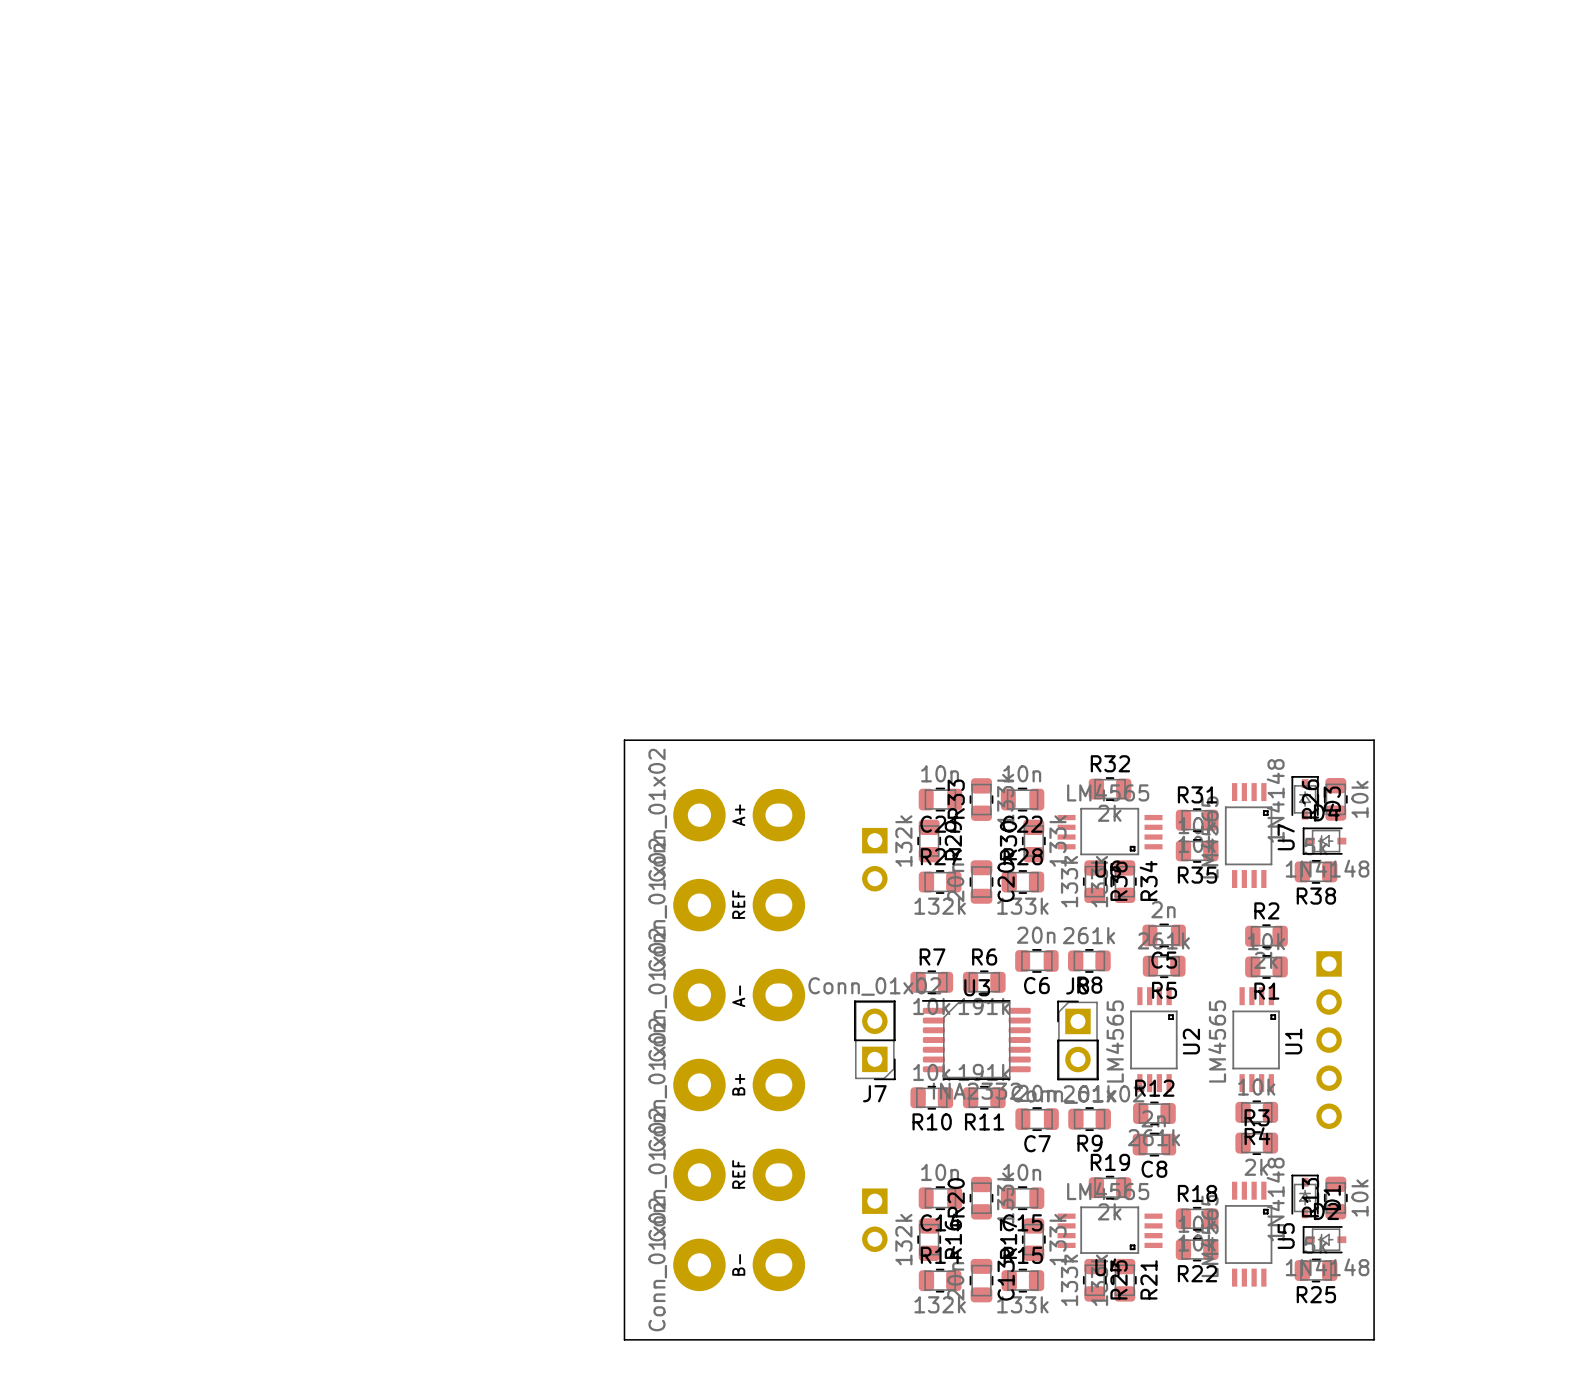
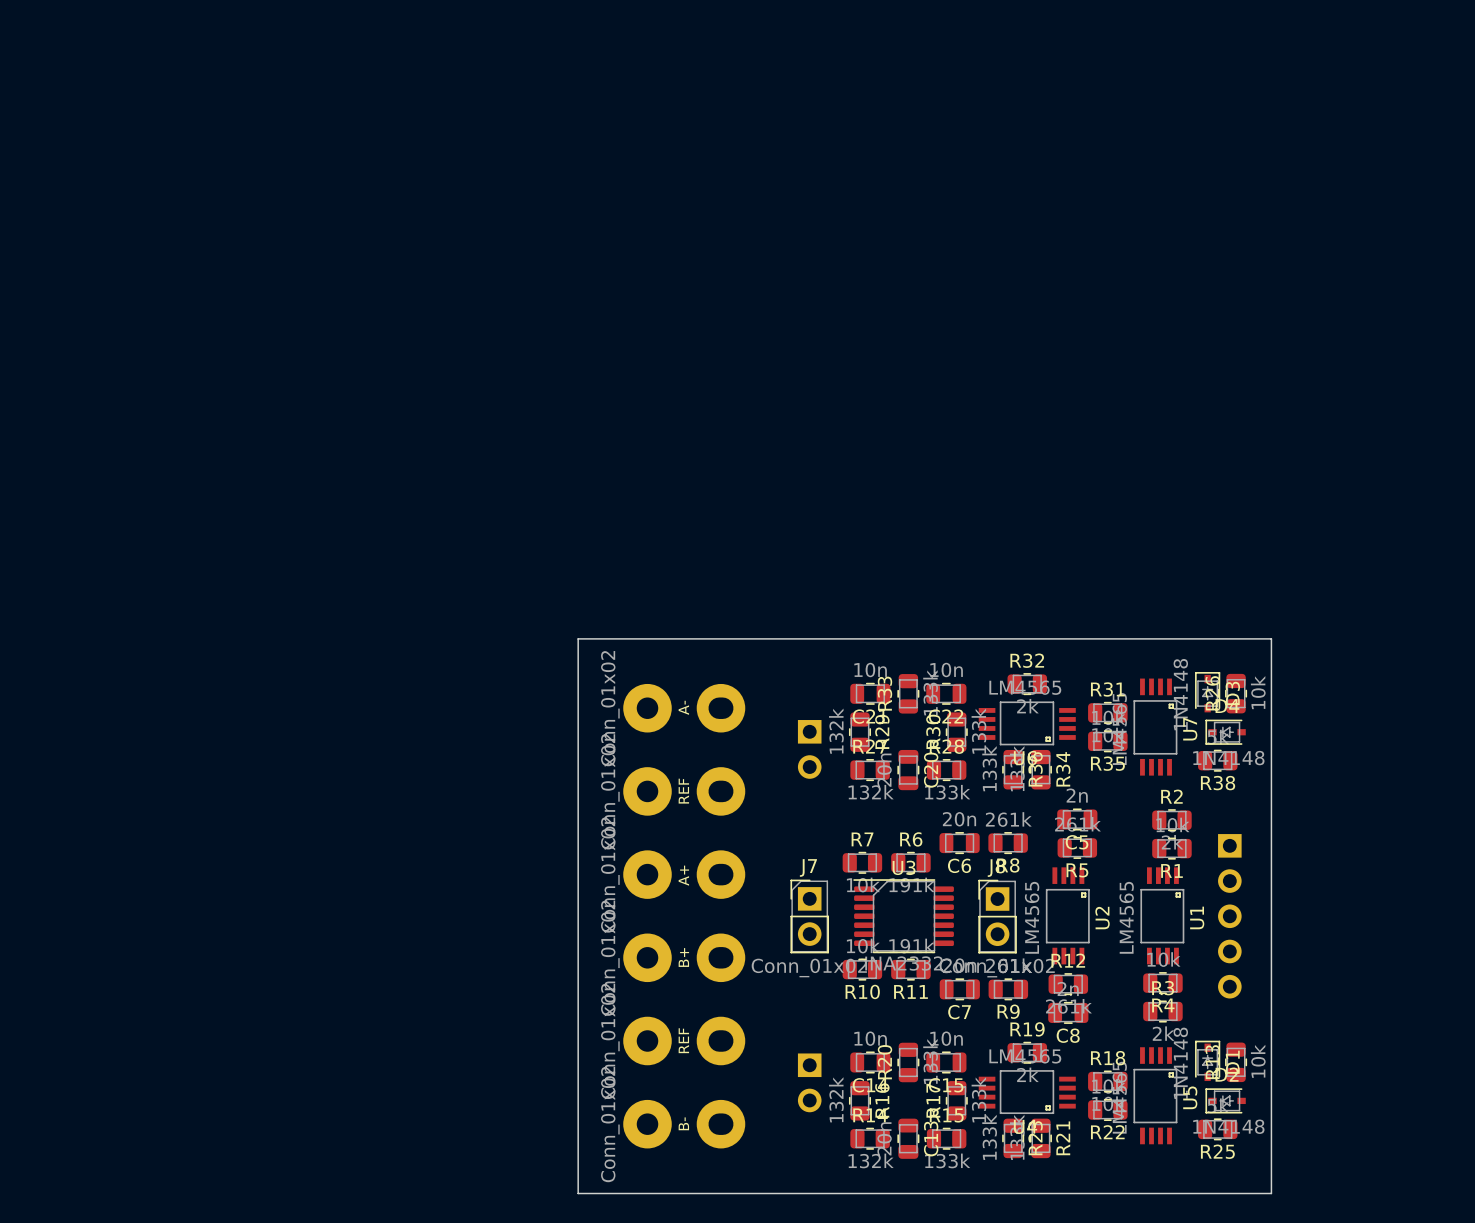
text: A+ (738, 815) -> A- (683, 707)
text: A- (738, 996) -> A+ (683, 875)
J7 rotation: 0° (874, 1040) -> 180° (809, 916)

